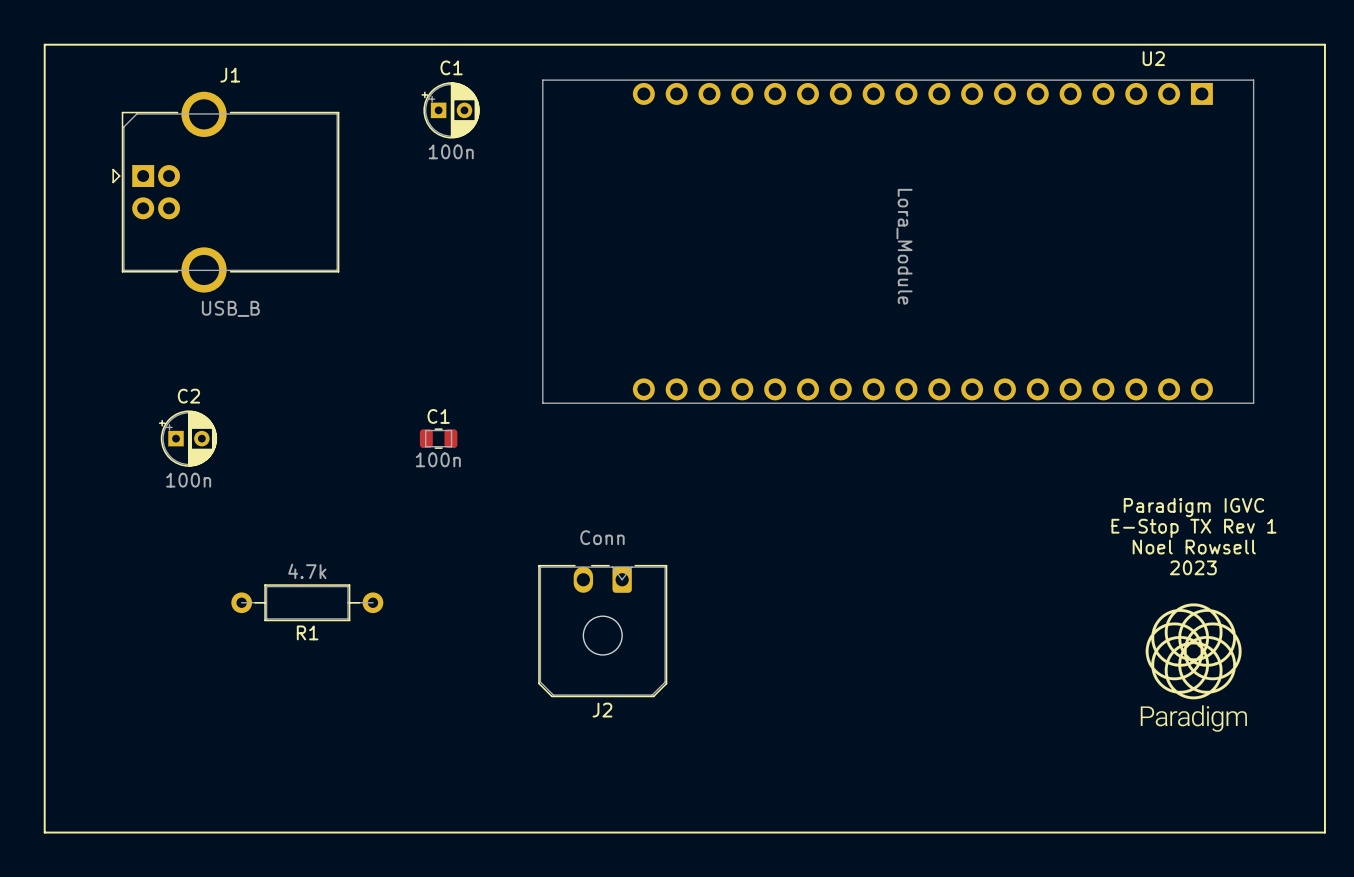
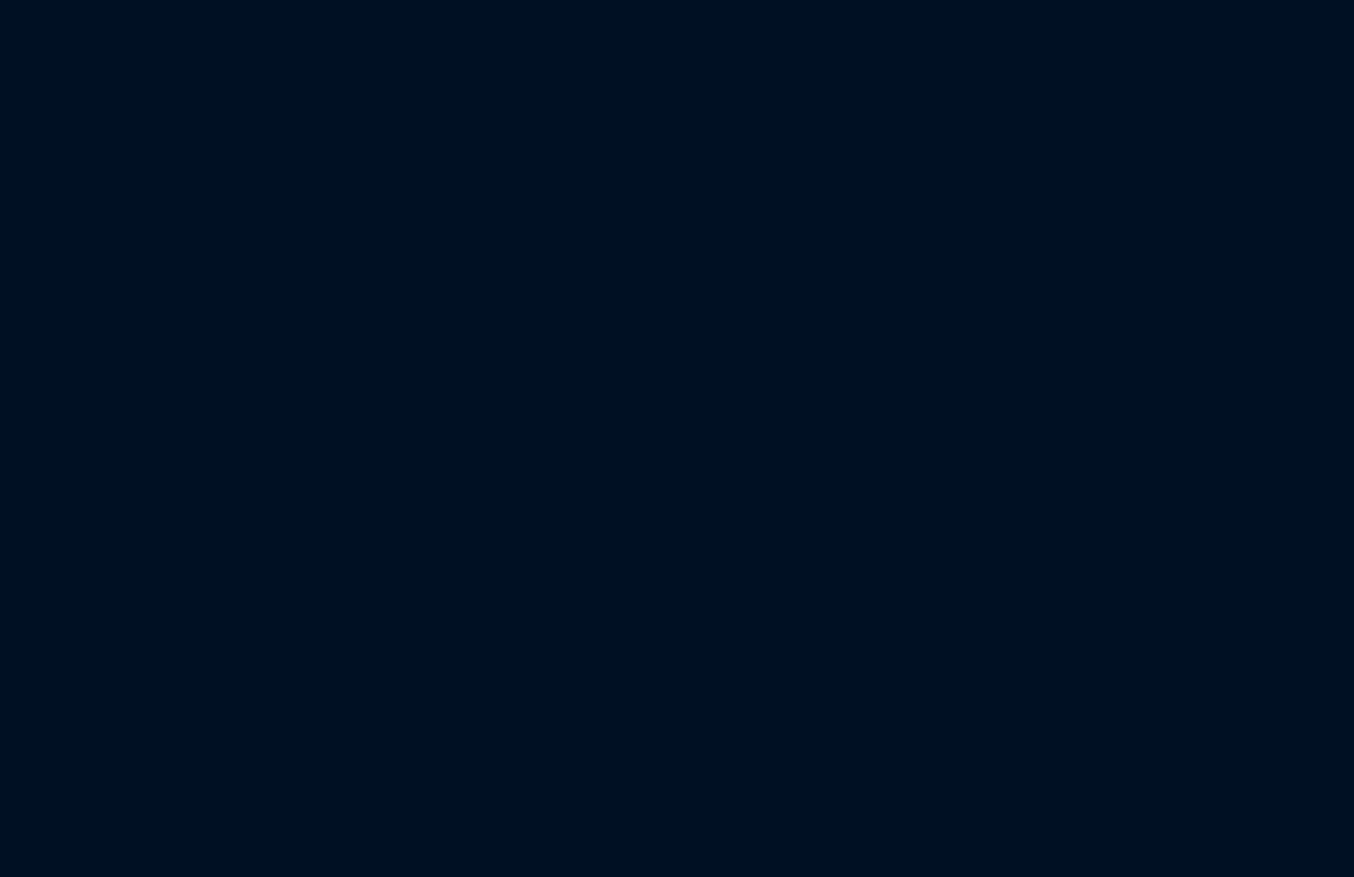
line: (44, 44) (44, 832) (1324, 832) (1324, 44) (44, 44) -> none
C1: 100n (450, 110) -> none
J1: USB_B (225, 192) -> none
U2: Lora_Module (898, 241) -> none
C2: 100n (187, 438) -> none
C1: 100n (438, 438) -> none
text: Paradigm IGVC (1193, 507) -> none
text: E-Stop TX Rev 1 (1193, 528) -> none
text: Noel Rowsell (1194, 547) -> none
text: 2023 (1193, 567) -> none
R1: 4.7k (307, 602) -> none
drawing: [1140, 603, 1247, 732] -> none
J2: Conn (602, 631) -> none

